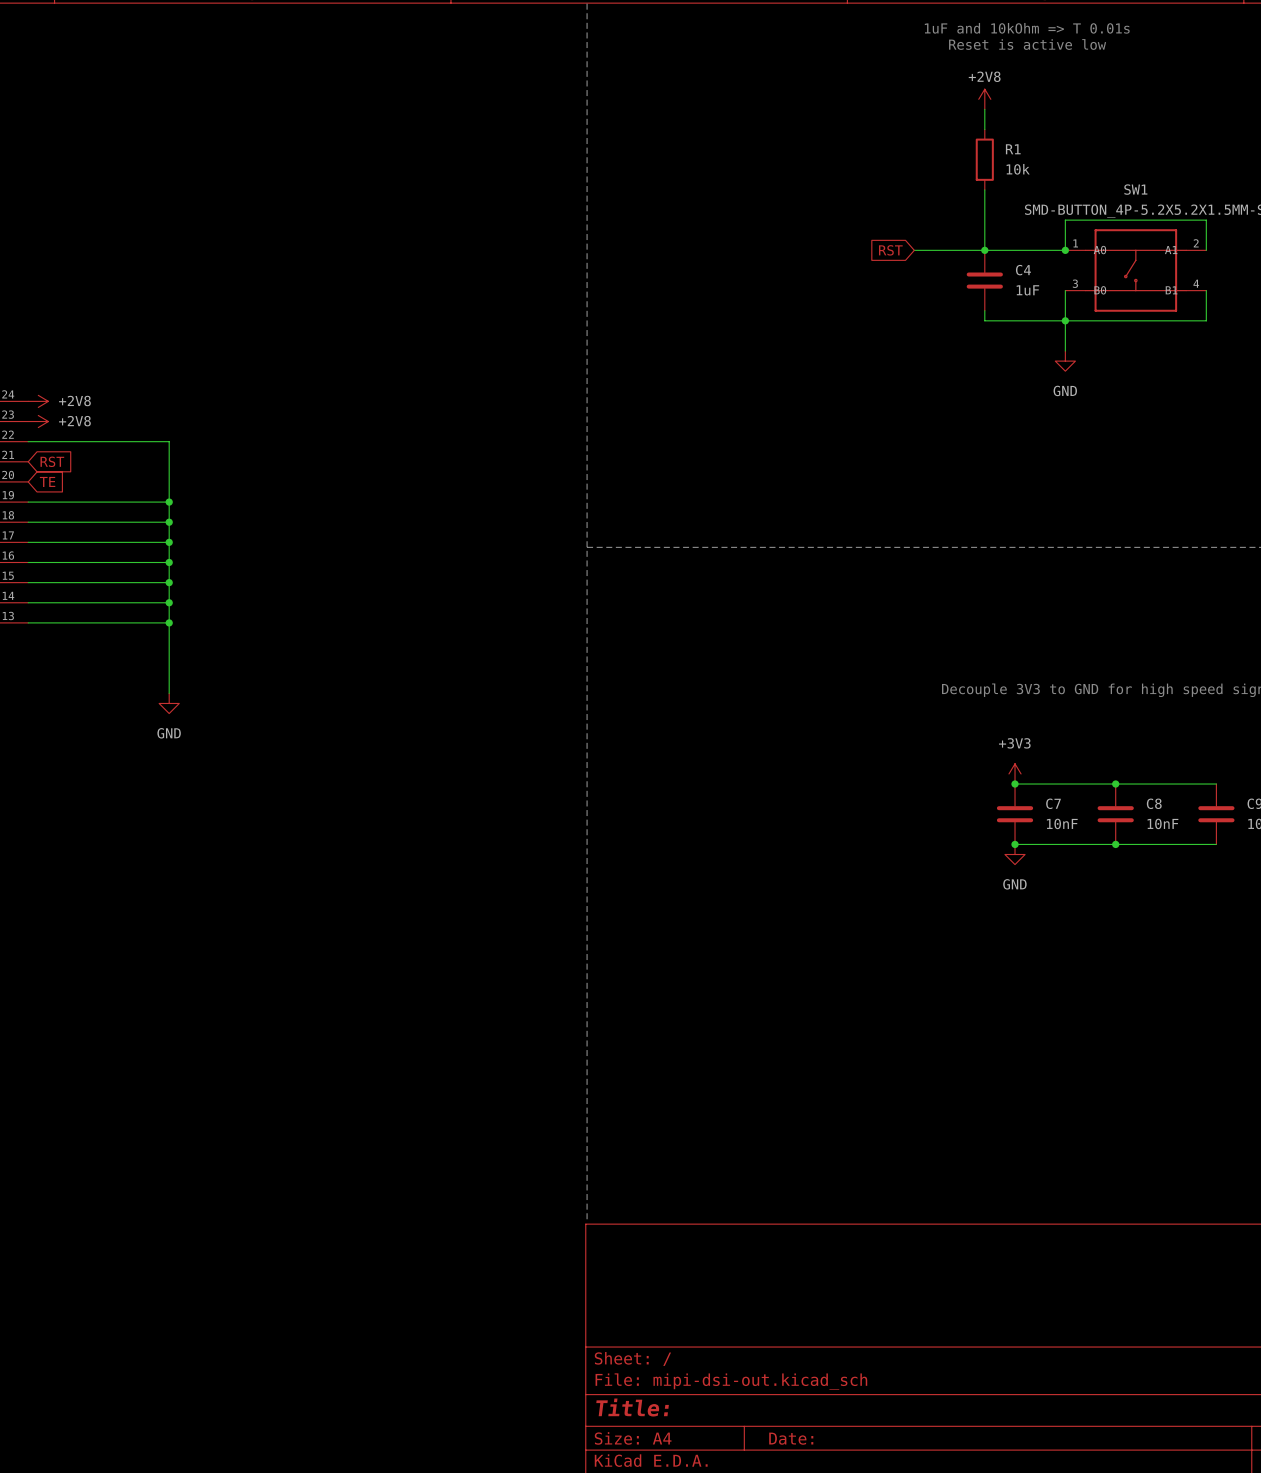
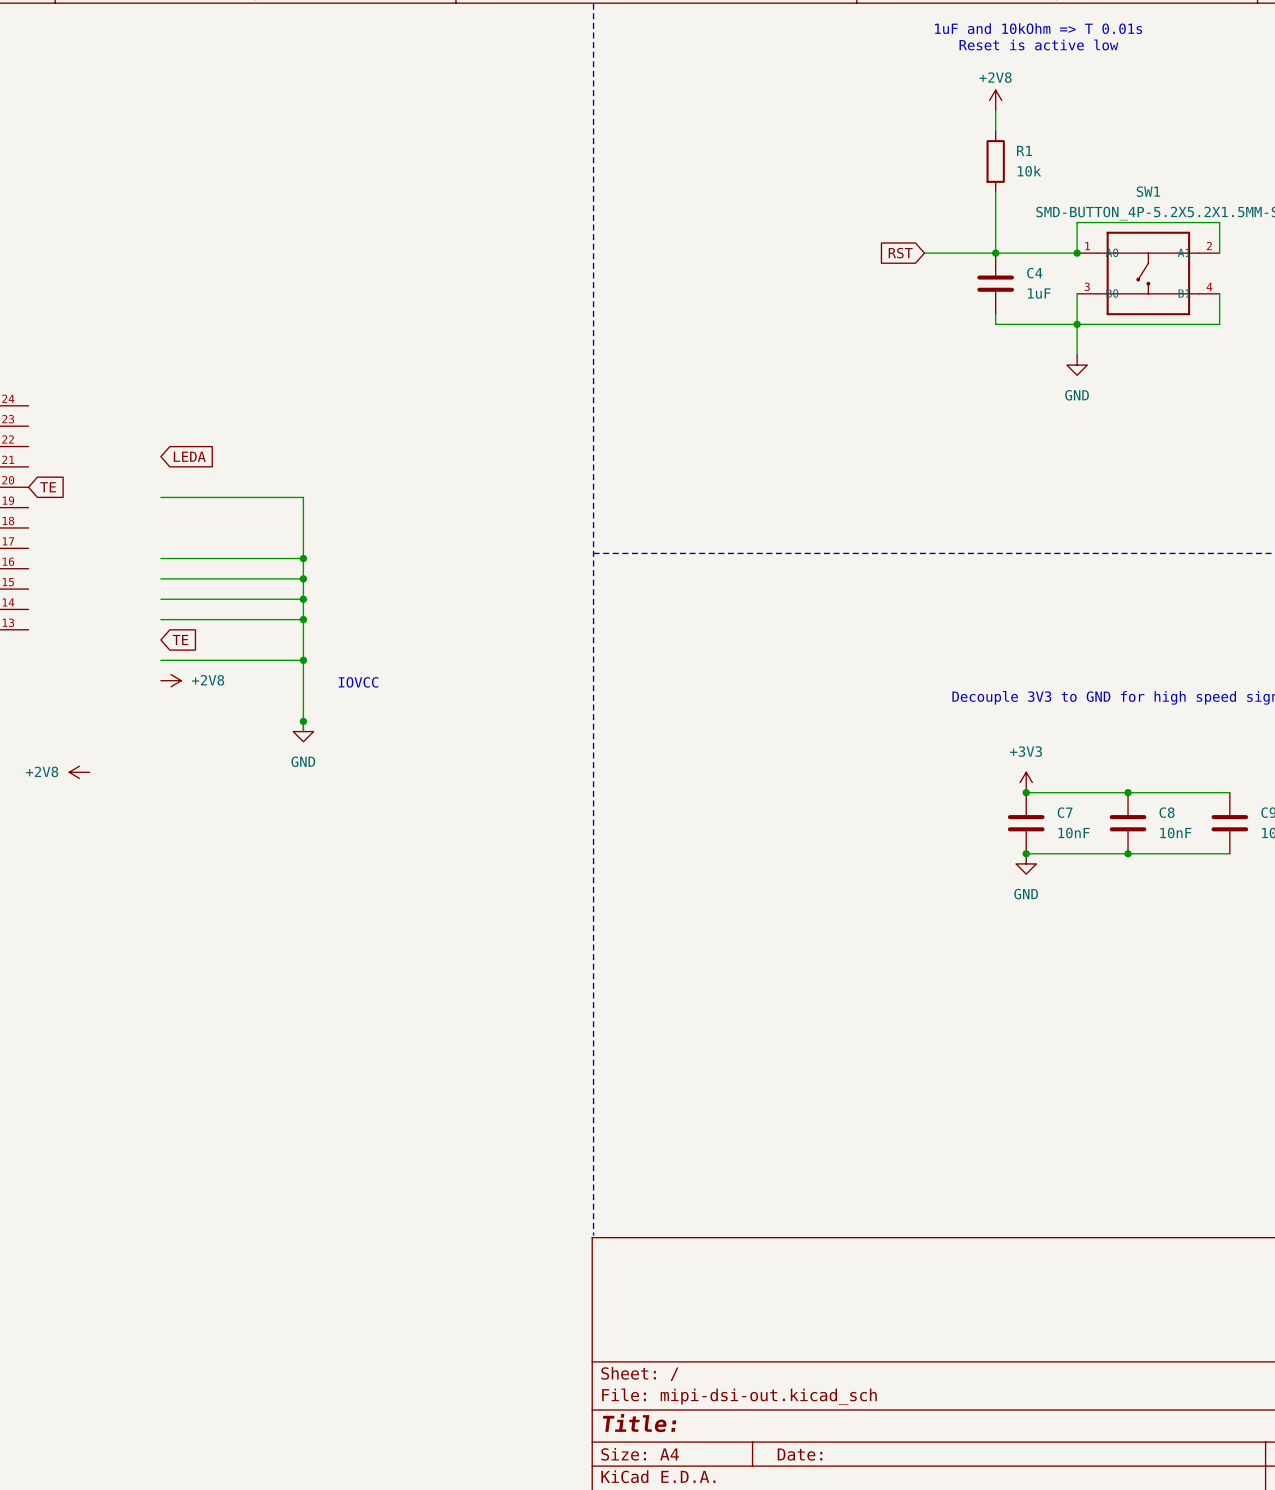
power symbol: +2V8 (38, 401) -> none
power symbol: +2V8 (38, 421) -> none
wire: (28, 441) (169, 441) (169, 693) -> none
global label: none -> LEDA (189, 456)
global label: RST (52, 461) -> none
wire: none -> (160, 497) (303, 497) (303, 731)
wire: (28, 502) (169, 502) -> none
junction: (169, 502) -> none
wire: (28, 522) (169, 522) -> (160, 558) (303, 558)
junction: (169, 522) -> none
wire: (28, 542) (169, 542) -> (160, 578) (303, 578)
junction: (169, 542) -> none
junction: none -> (303, 558)
wire: (28, 562) (169, 562) -> (160, 599) (303, 599)
junction: (169, 562) -> none
junction: none -> (303, 578)
wire: (28, 582) (169, 582) -> (160, 619) (303, 619)
junction: (169, 582) -> none
junction: none -> (303, 599)
wire: (28, 602) (169, 602) -> none
junction: (169, 602) -> none
junction: none -> (303, 619)
wire: (28, 622) (169, 622) -> (160, 660) (303, 660)
junction: (169, 622) -> none
global label: none -> TE (180, 639)
junction: none -> (303, 660)
power symbol: none -> +2V8 (171, 680)
text: none -> IOVCC (358, 682)
power symbol position: GND (169, 703) -> GND (303, 731)
junction: none -> (303, 721)
power symbol: none -> +2V8 (79, 772)

